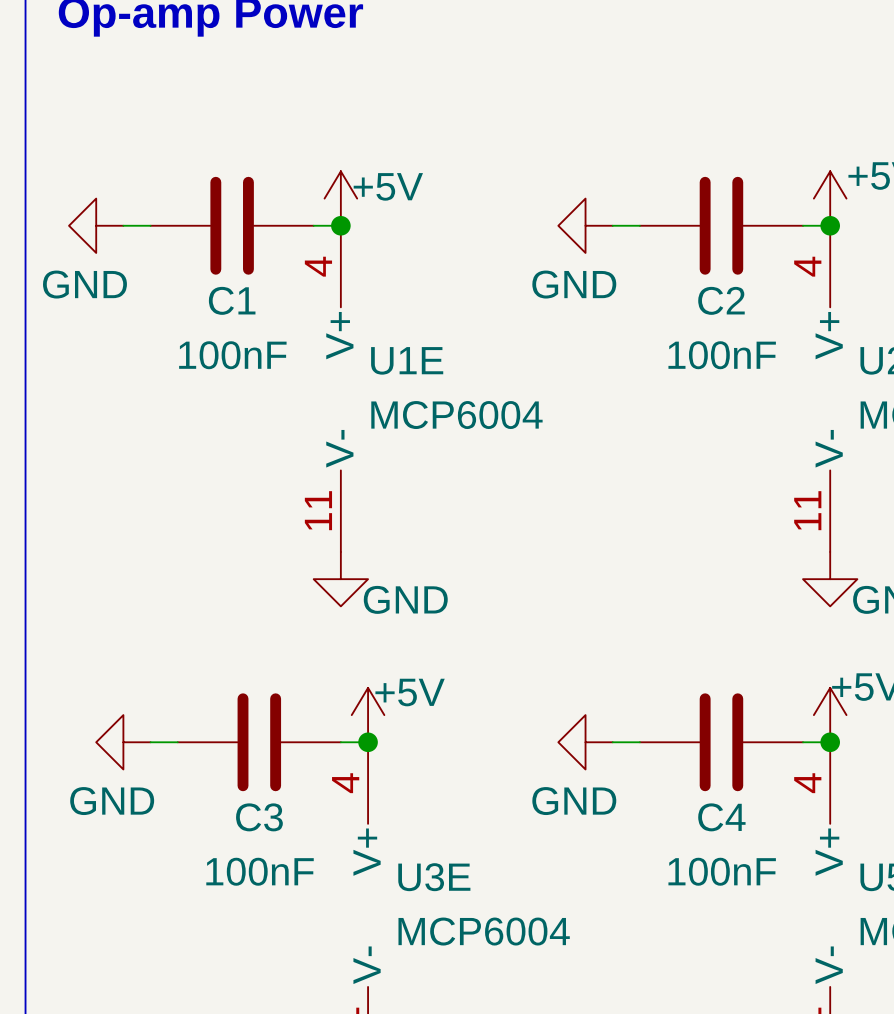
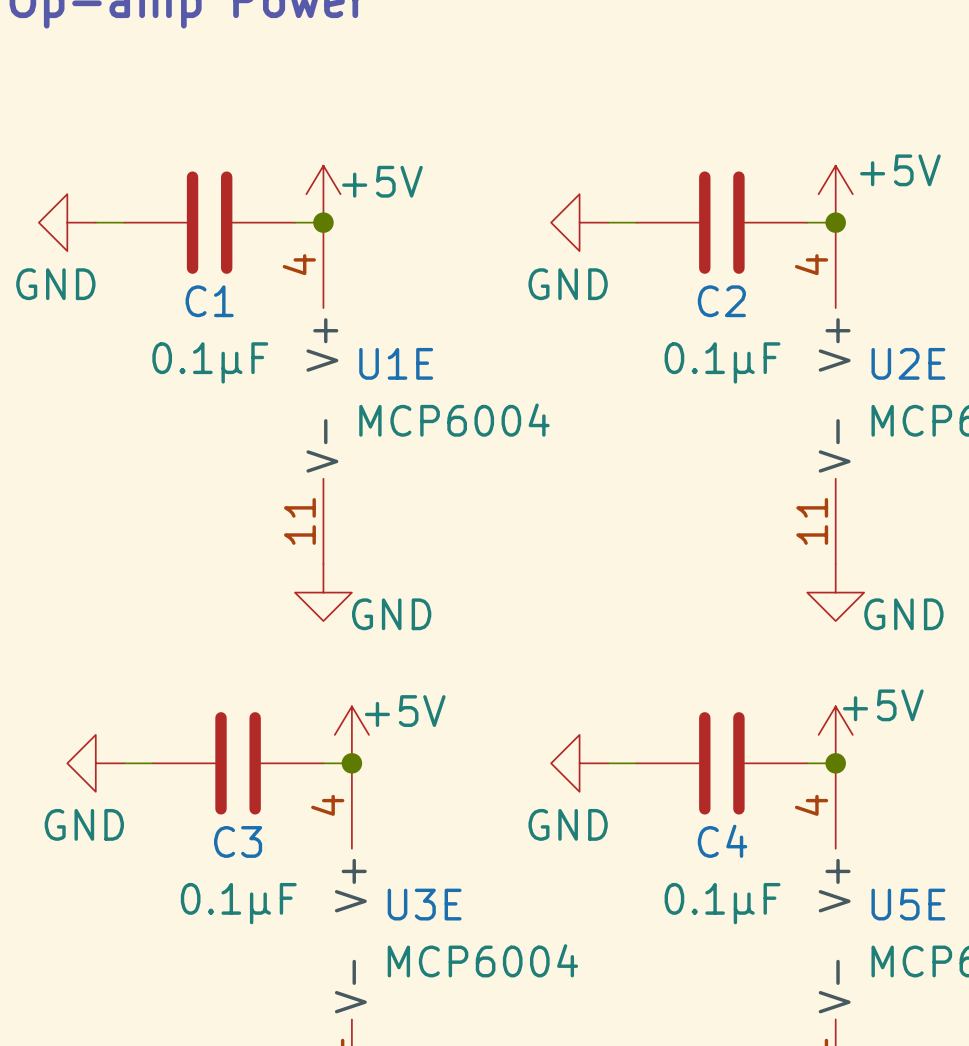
C1 value: 100nF (232, 355) -> 0.1μF (210, 362)
C2 value: 100nF (722, 355) -> 0.1μF (722, 362)
C3 value: 100nF (260, 871) -> 0.1μF (238, 903)
C4 value: 100nF (722, 871) -> 0.1μF (722, 903)

